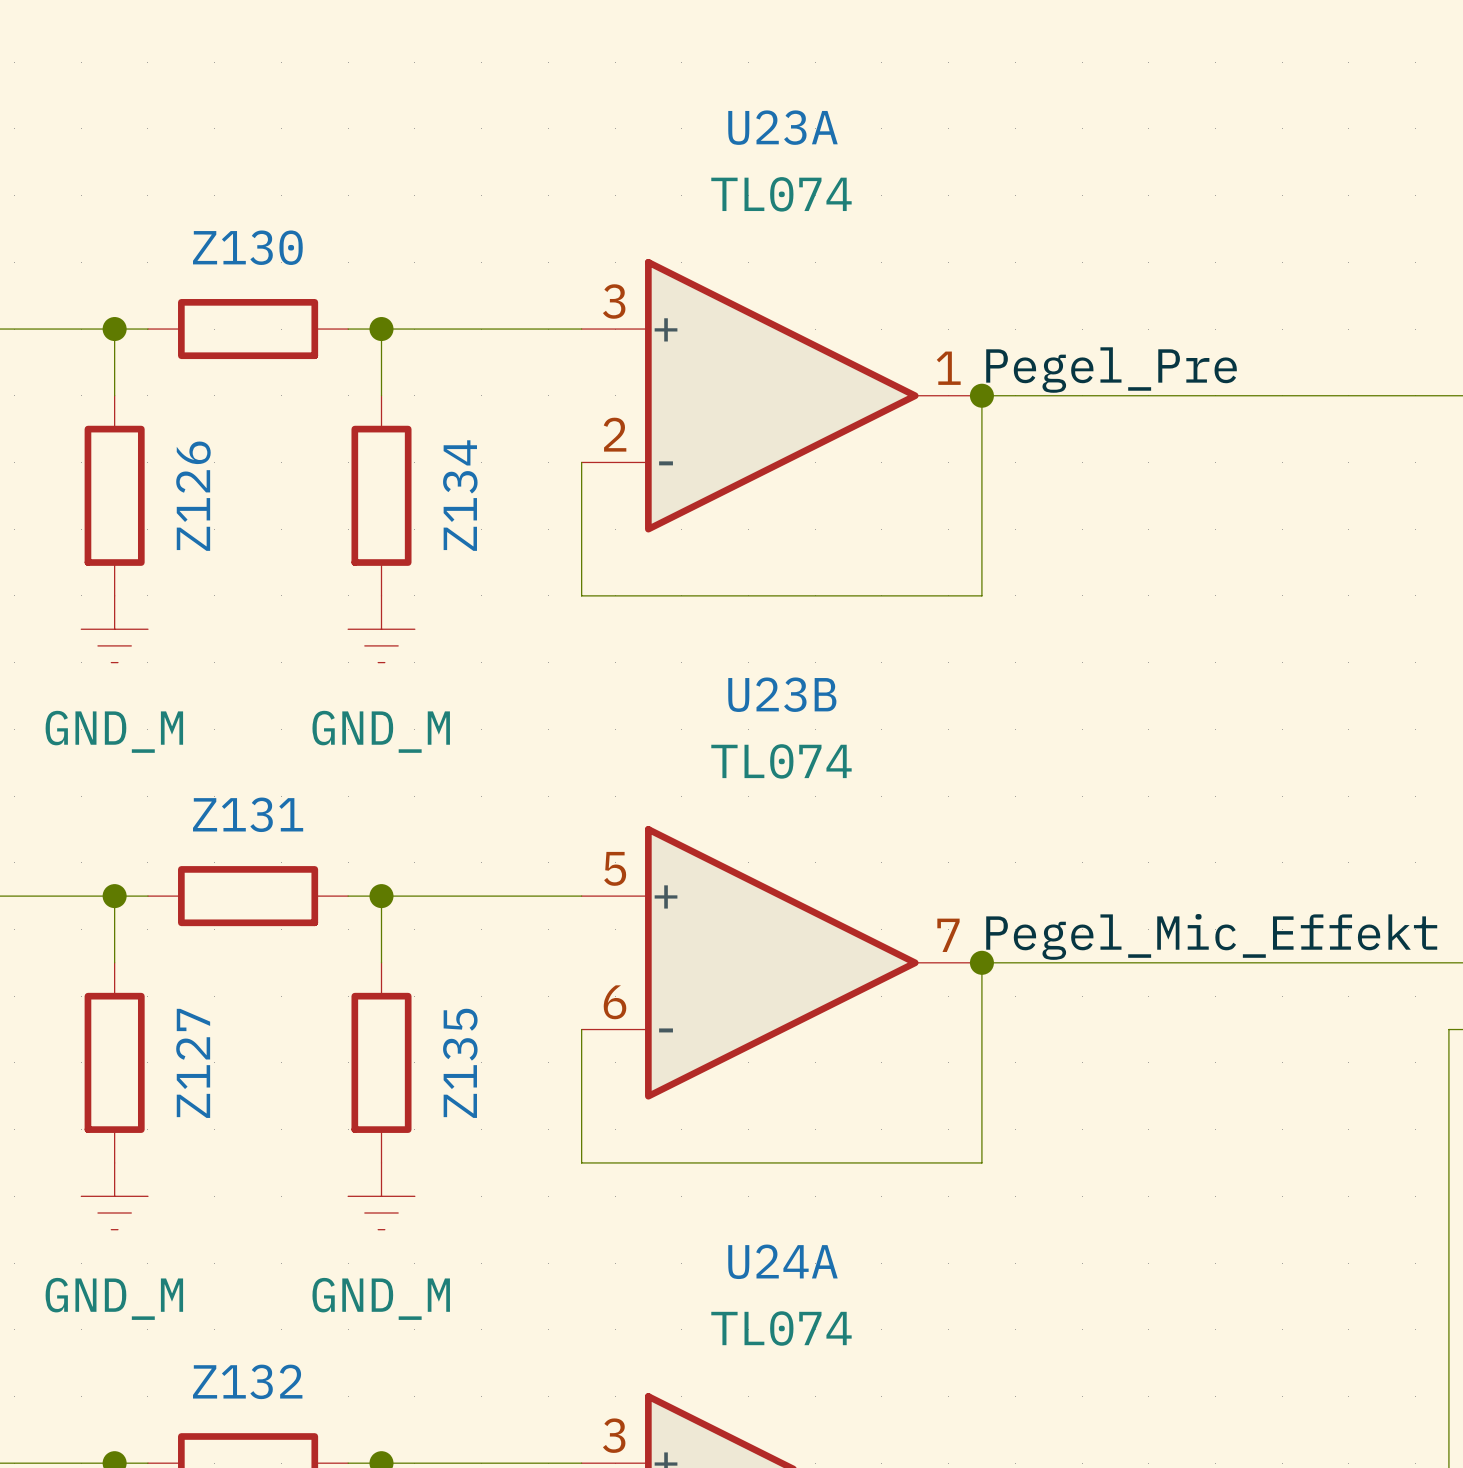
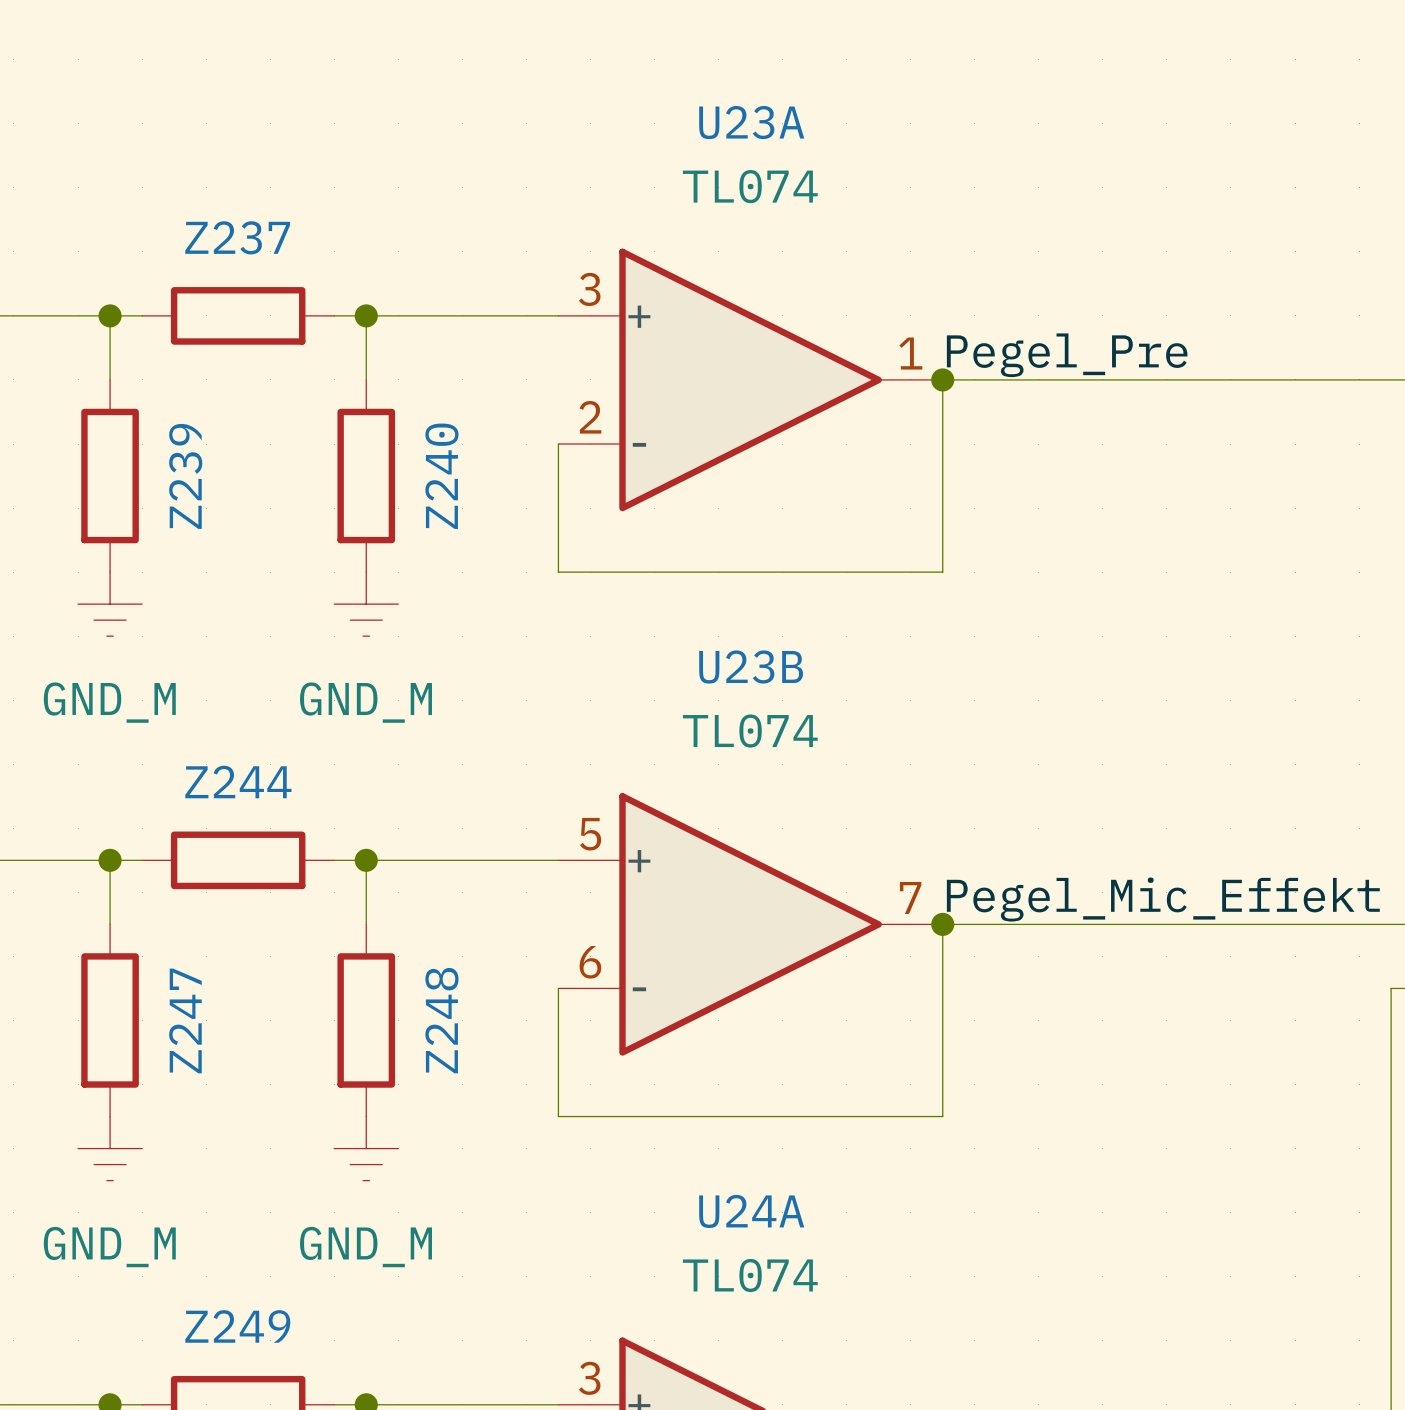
Z130 name: Z130 (247, 247) -> Z237 (237, 237)
Z134 name: Z134 (460, 495) -> Z240 (441, 476)
Z126 name: Z126 (193, 496) -> Z239 (185, 476)
Z131 name: Z131 (248, 814) -> Z244 (238, 782)
Z127 name: Z127 (193, 1063) -> Z247 (185, 1020)
Z135 name: Z135 (460, 1063) -> Z248 (441, 1020)
Z132 name: Z132 (247, 1381) -> Z249 (237, 1326)

